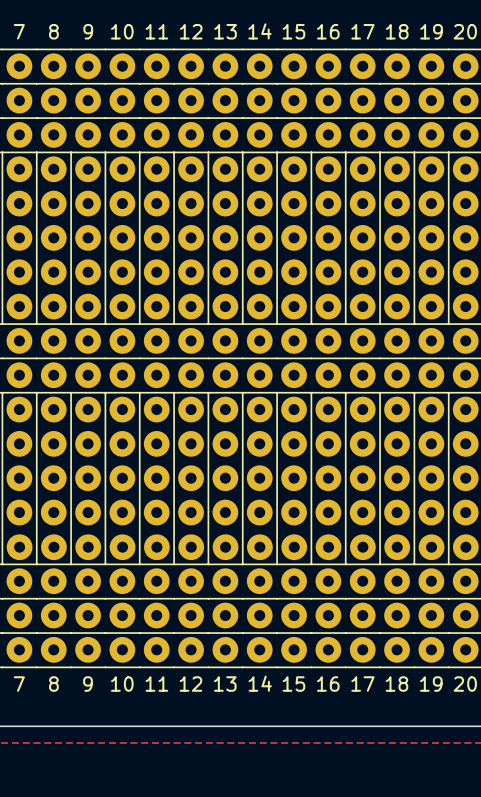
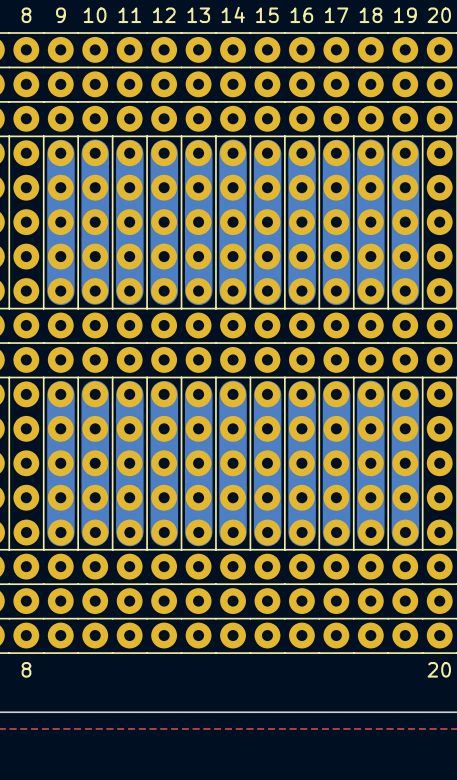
bottom track: none -> (60, 153) (60, 291)
bottom track: none -> (95, 153) (95, 291)
bottom track: none -> (129, 153) (129, 291)
bottom track: none -> (164, 153) (164, 291)
bottom track: none -> (198, 153) (198, 291)
bottom track: none -> (233, 153) (233, 291)
bottom track: none -> (267, 153) (267, 291)
bottom track: none -> (302, 153) (302, 291)
bottom track: none -> (336, 153) (336, 291)
bottom track: none -> (370, 153) (370, 291)
bottom track: none -> (405, 153) (405, 291)
bottom track: none -> (60, 394) (60, 532)
bottom track: none -> (95, 394) (95, 532)
bottom track: none -> (129, 394) (129, 532)
bottom track: none -> (164, 394) (164, 532)
bottom track: none -> (198, 394) (198, 532)
bottom track: none -> (233, 394) (233, 532)
bottom track: none -> (267, 394) (267, 532)
bottom track: none -> (302, 394) (302, 532)
bottom track: none -> (336, 394) (336, 532)
bottom track: none -> (370, 394) (370, 532)
bottom track: none -> (405, 394) (405, 532)
text: 14 (260, 683) -> none
text: 9 (87, 684) -> none
text: 10 (122, 684) -> none
text: 11 (156, 684) -> none
text: 12 (190, 684) -> none
text: 13 (225, 684) -> none
text: 15 (293, 684) -> none
text: 16 (328, 684) -> none
text: 17 (362, 684) -> none
text: 18 (396, 684) -> none
text: 19 (431, 684) -> none

